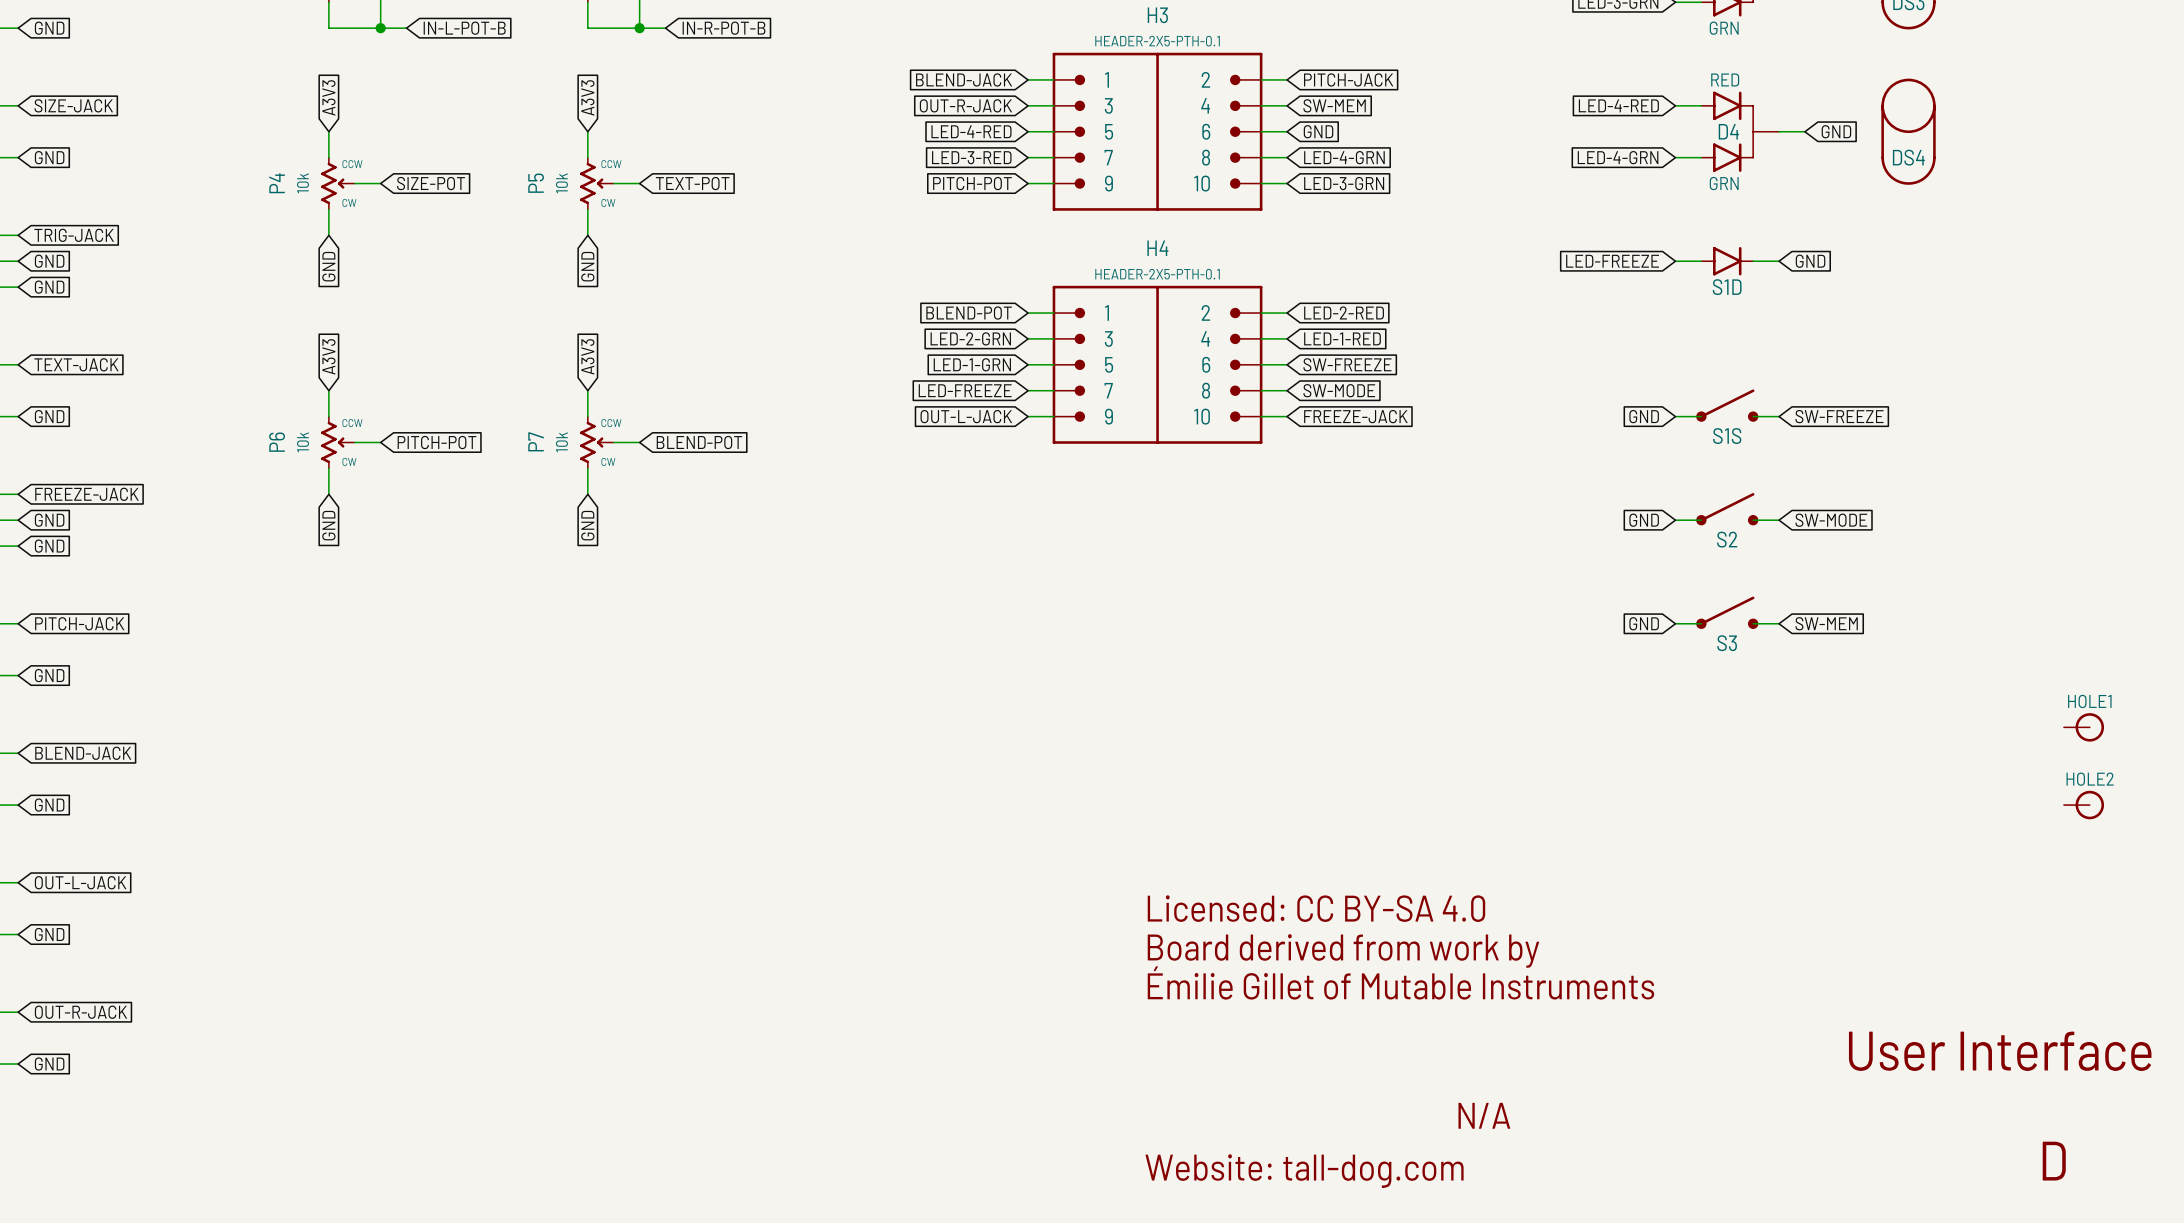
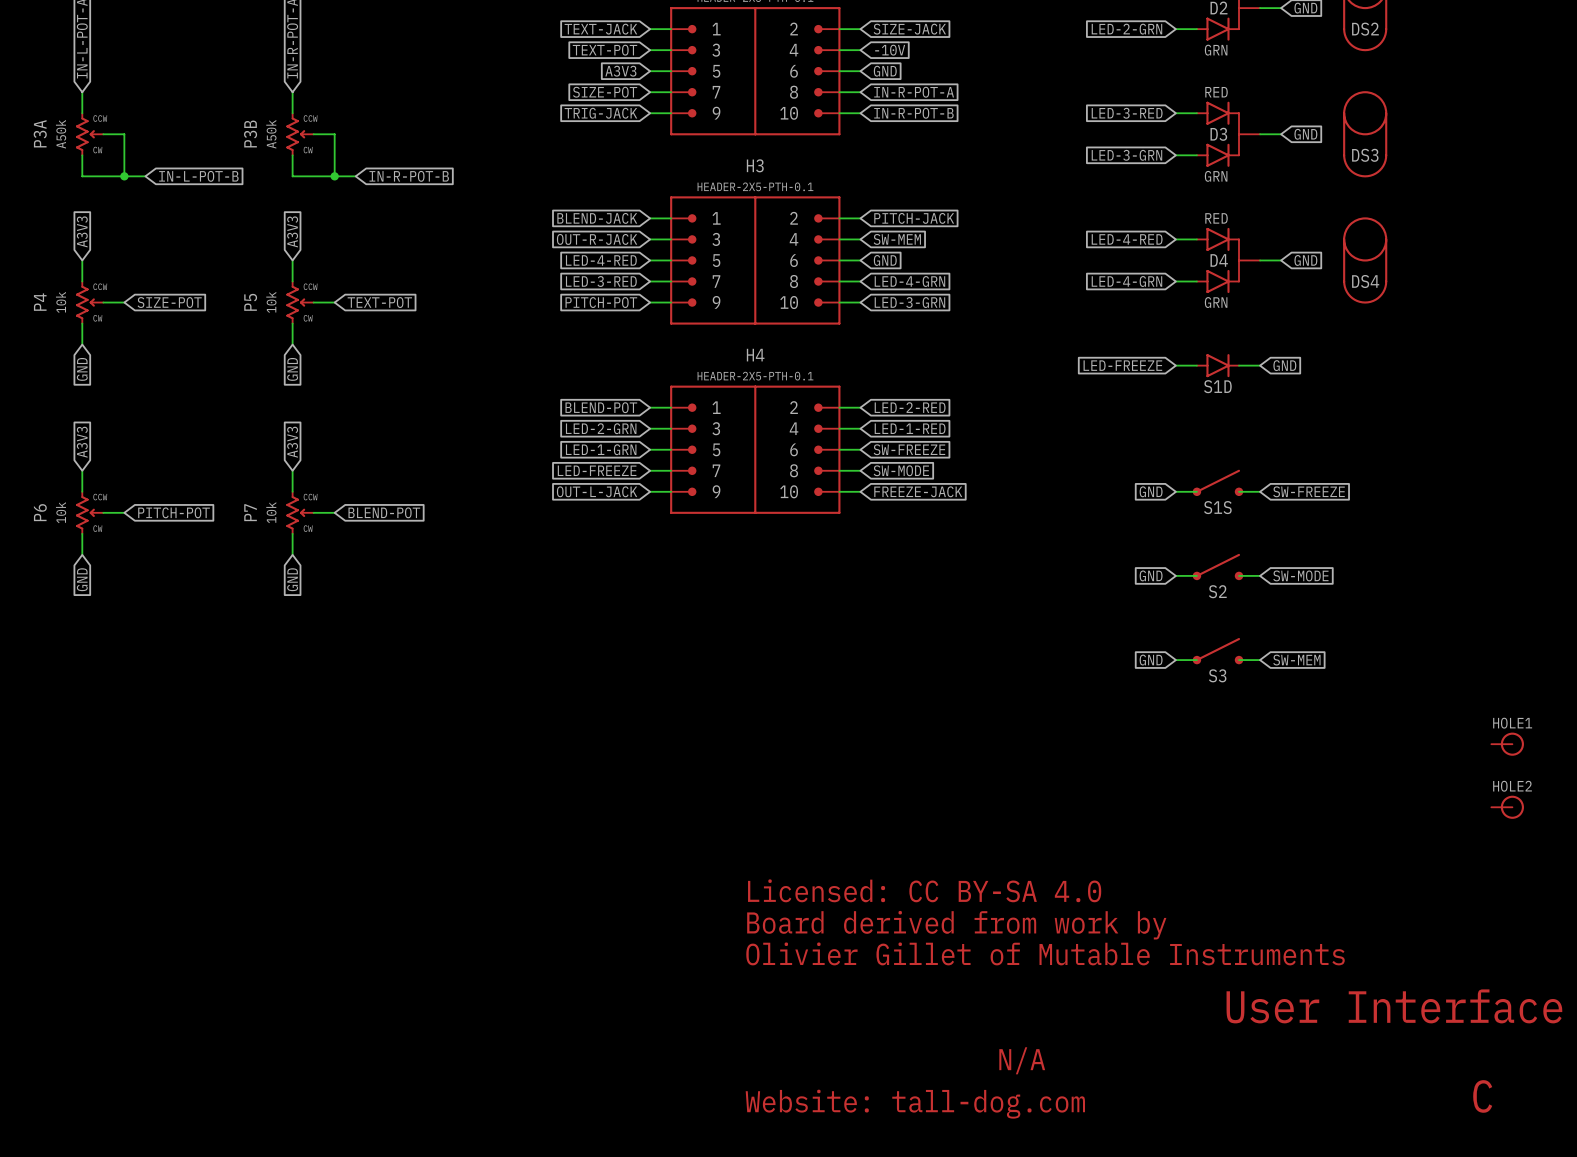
text: Émilie Gillet of Mutable Instruments (1400, 982) -> Olivier Gillet of Mutable Instruments (1045, 953)
text: D (2054, 1161) -> C (1482, 1096)

